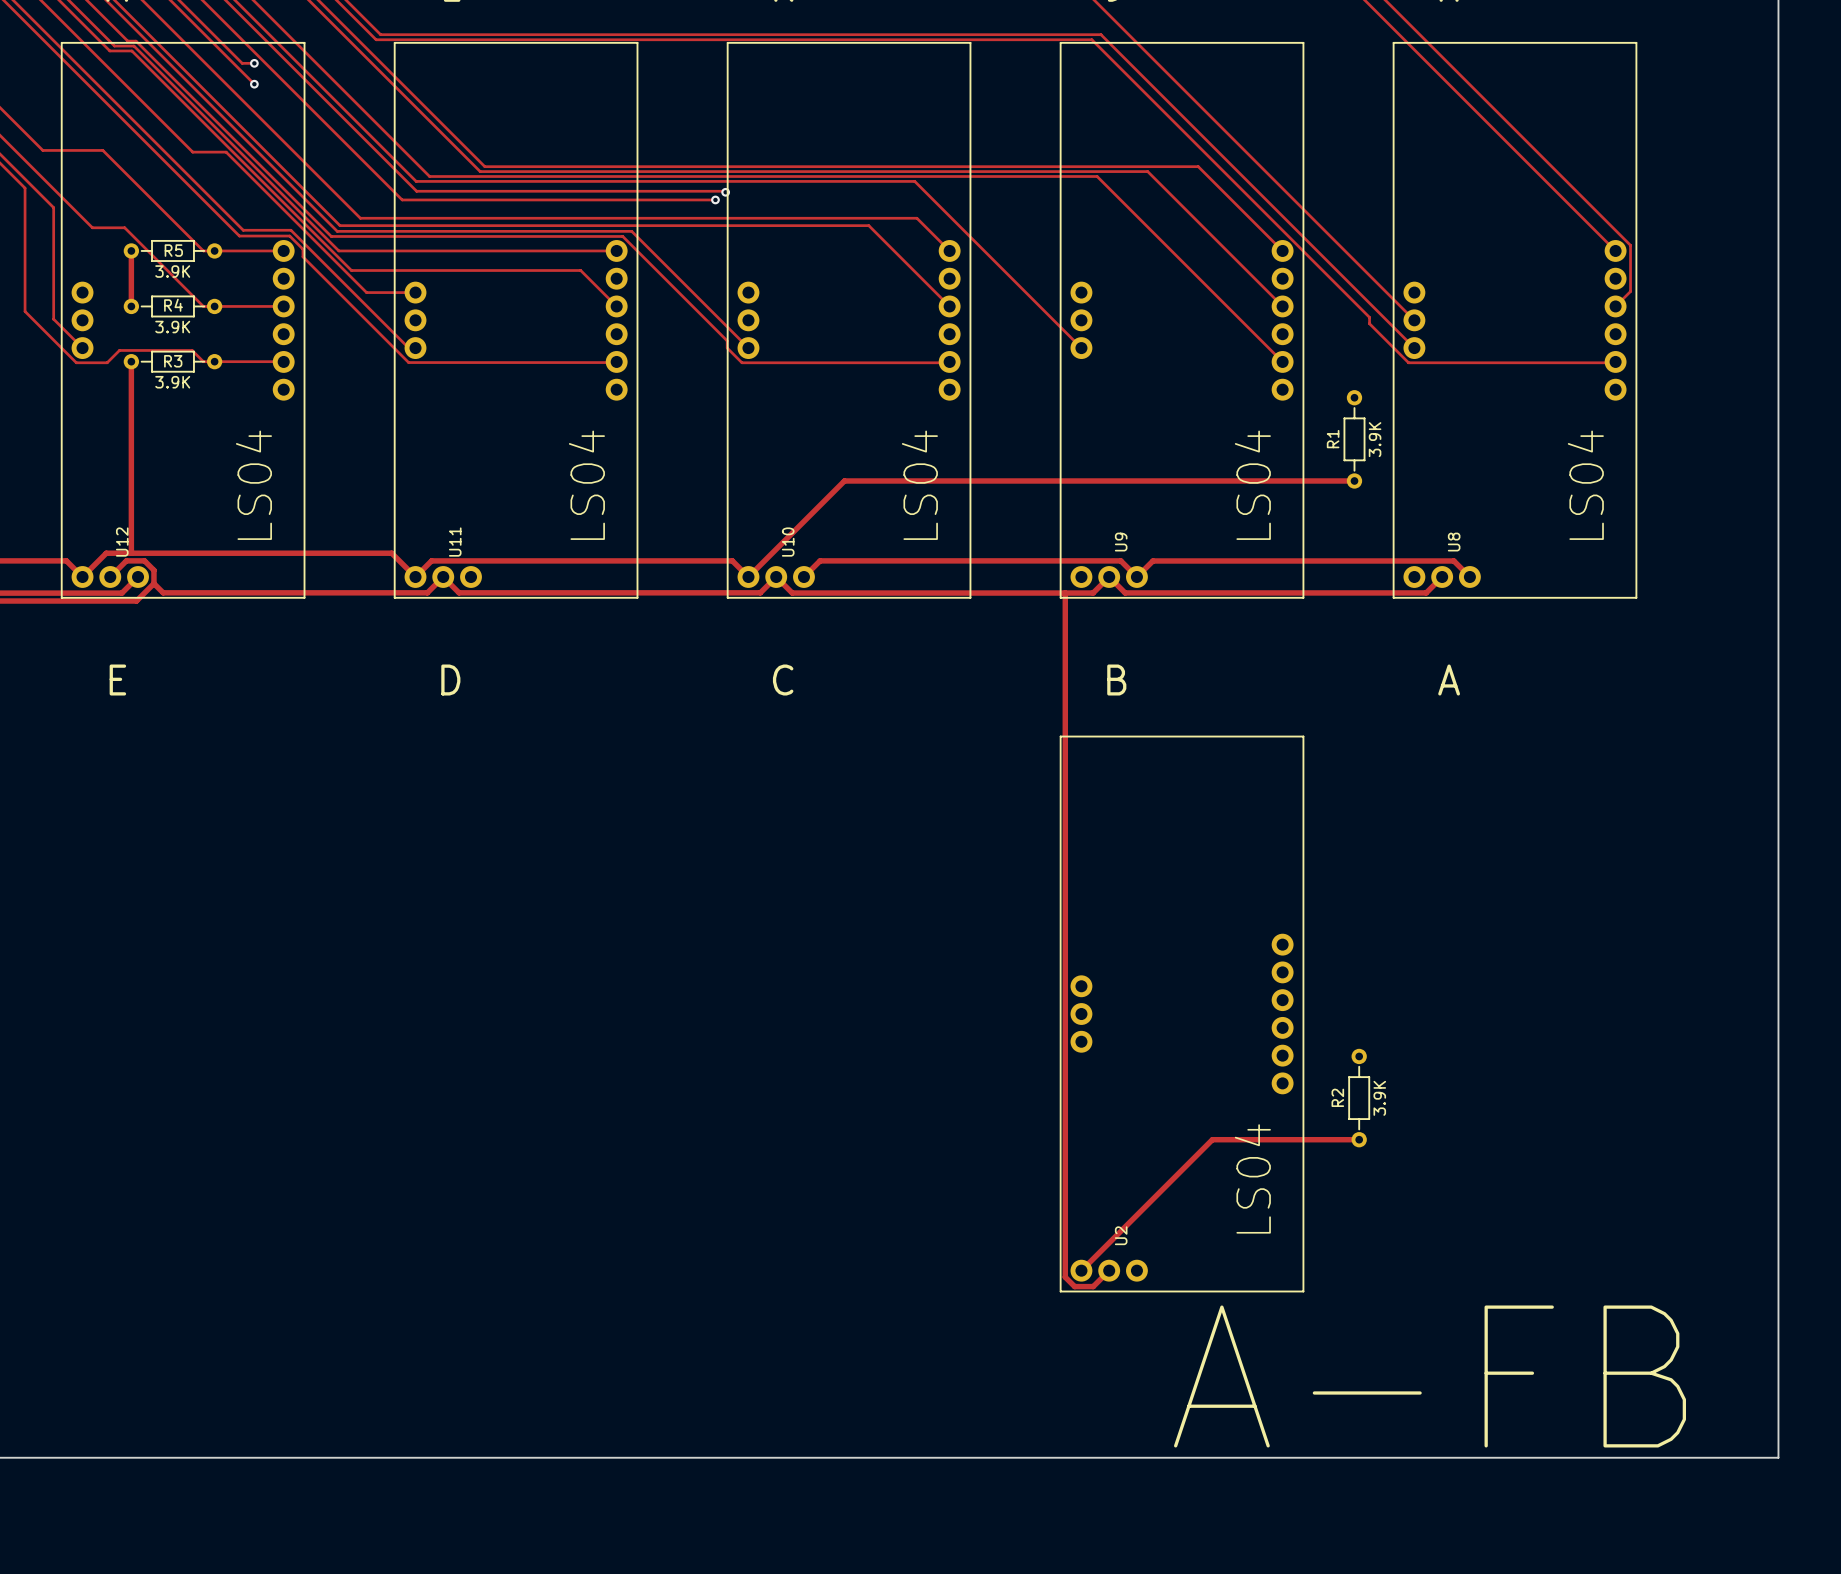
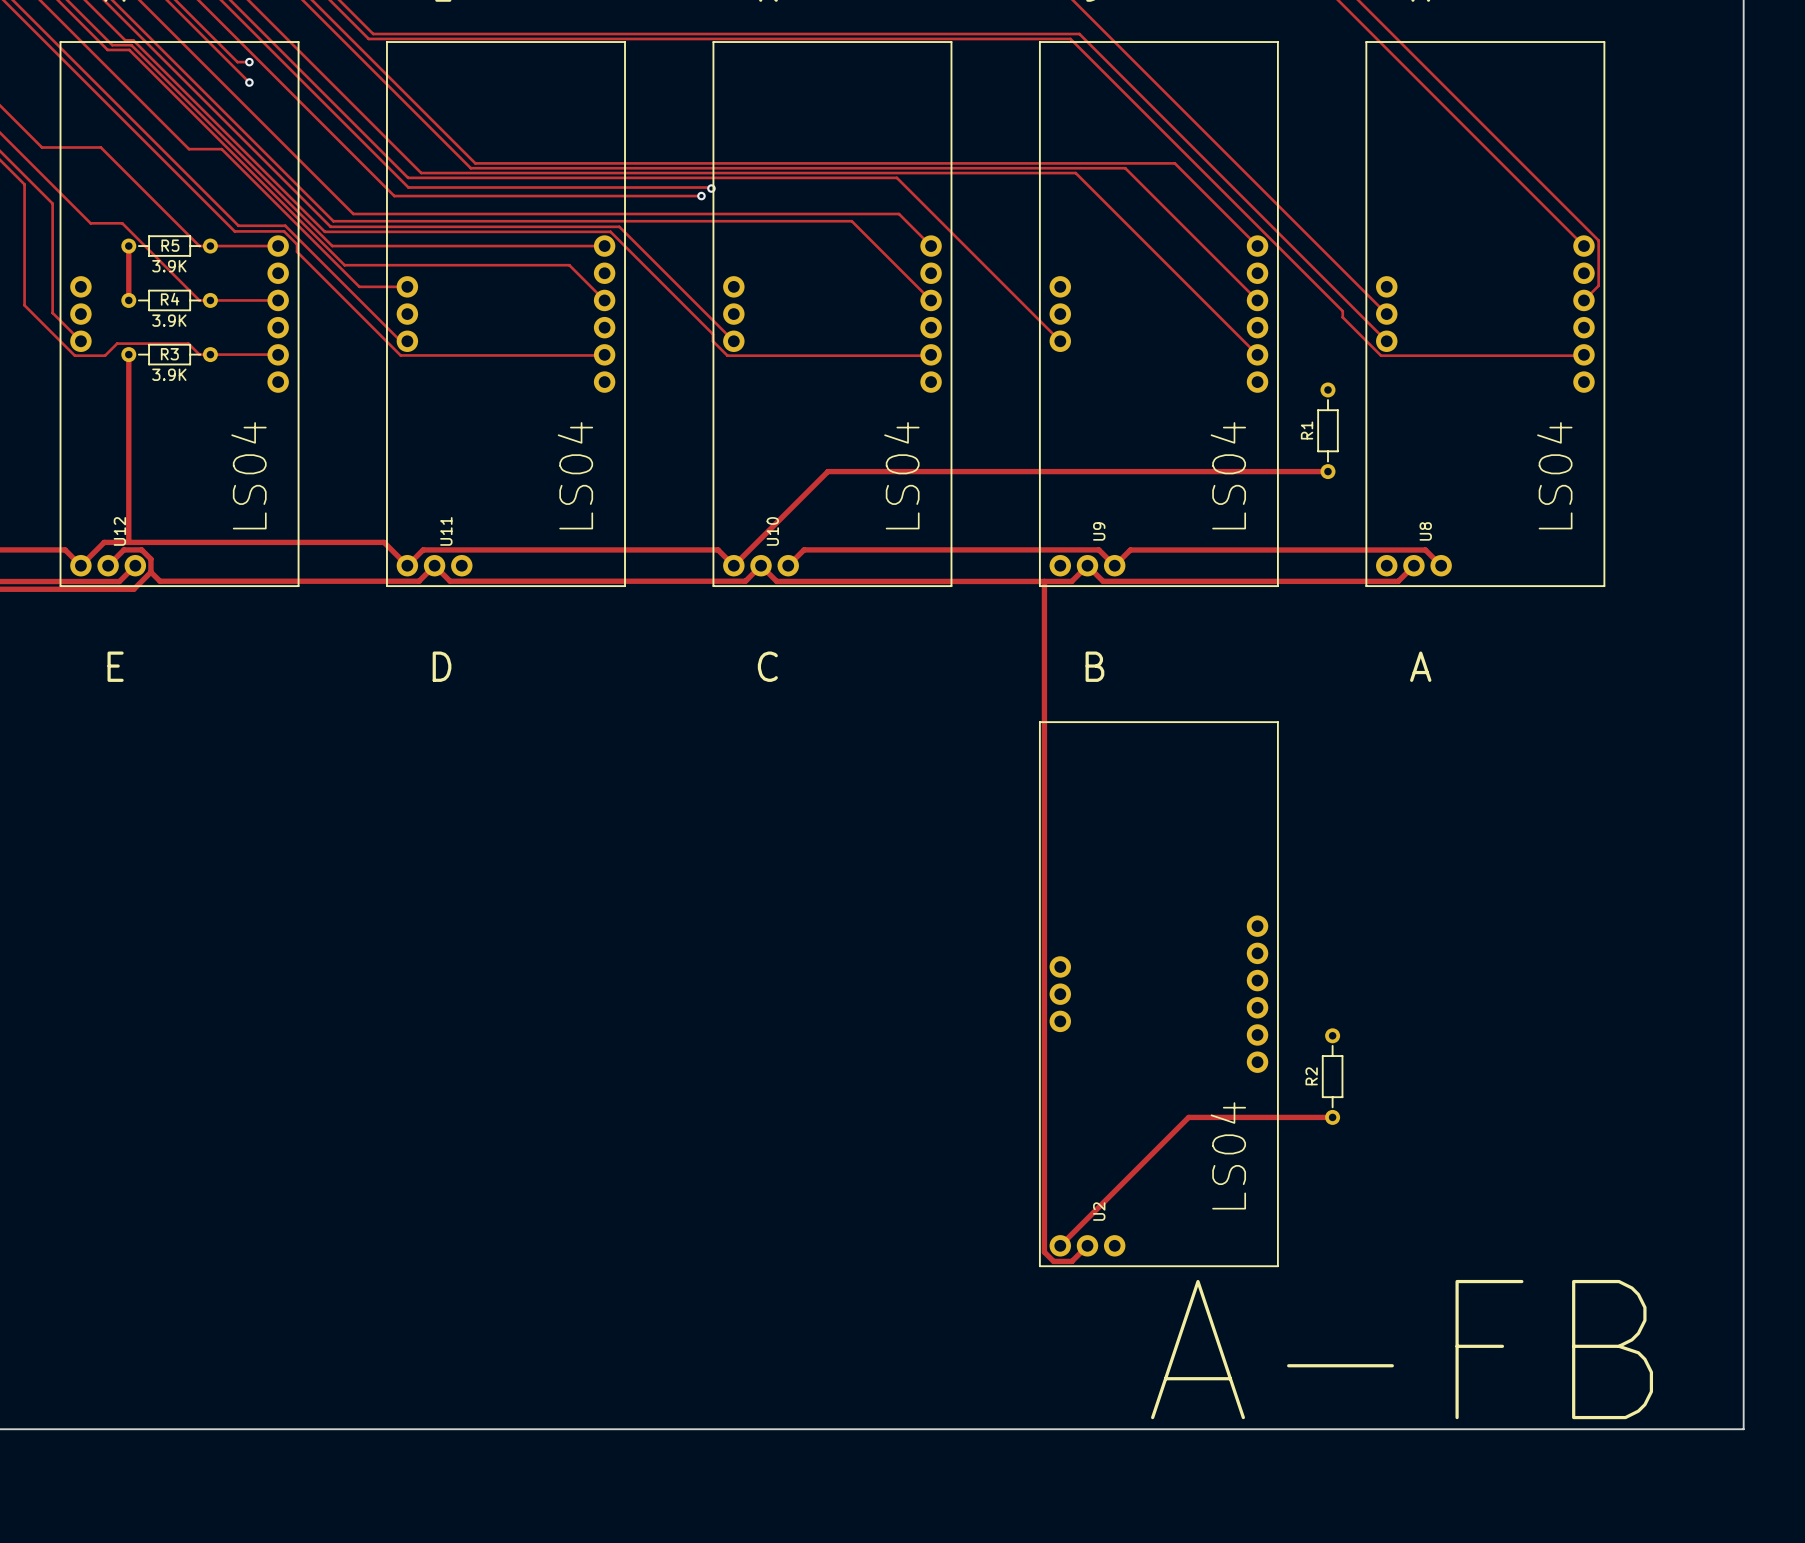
R1 value: 3.9K (1375, 439) -> none
R2 value: 3.9K (1379, 1098) -> none

